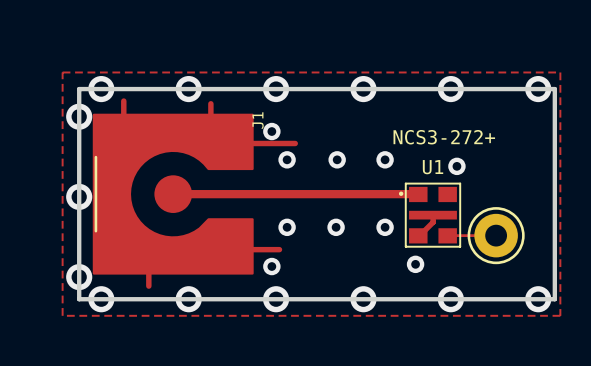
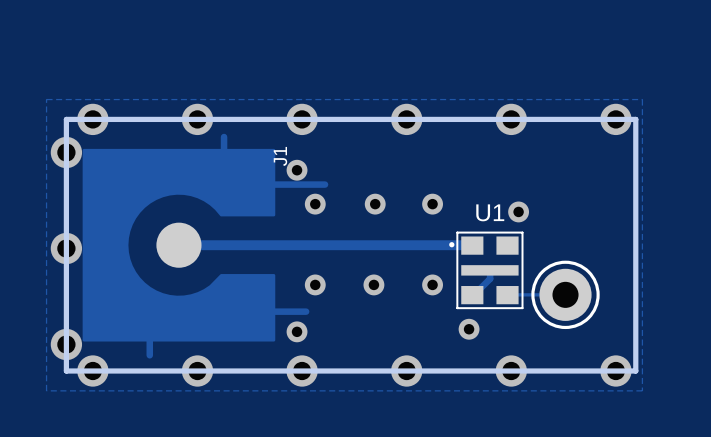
track: (123, 101) (123, 120) -> none
J1 footprint: [92, 113, 254, 275] -> [82, 148, 276, 342]
U1 value: NCS3-272+ (444, 137) -> none

